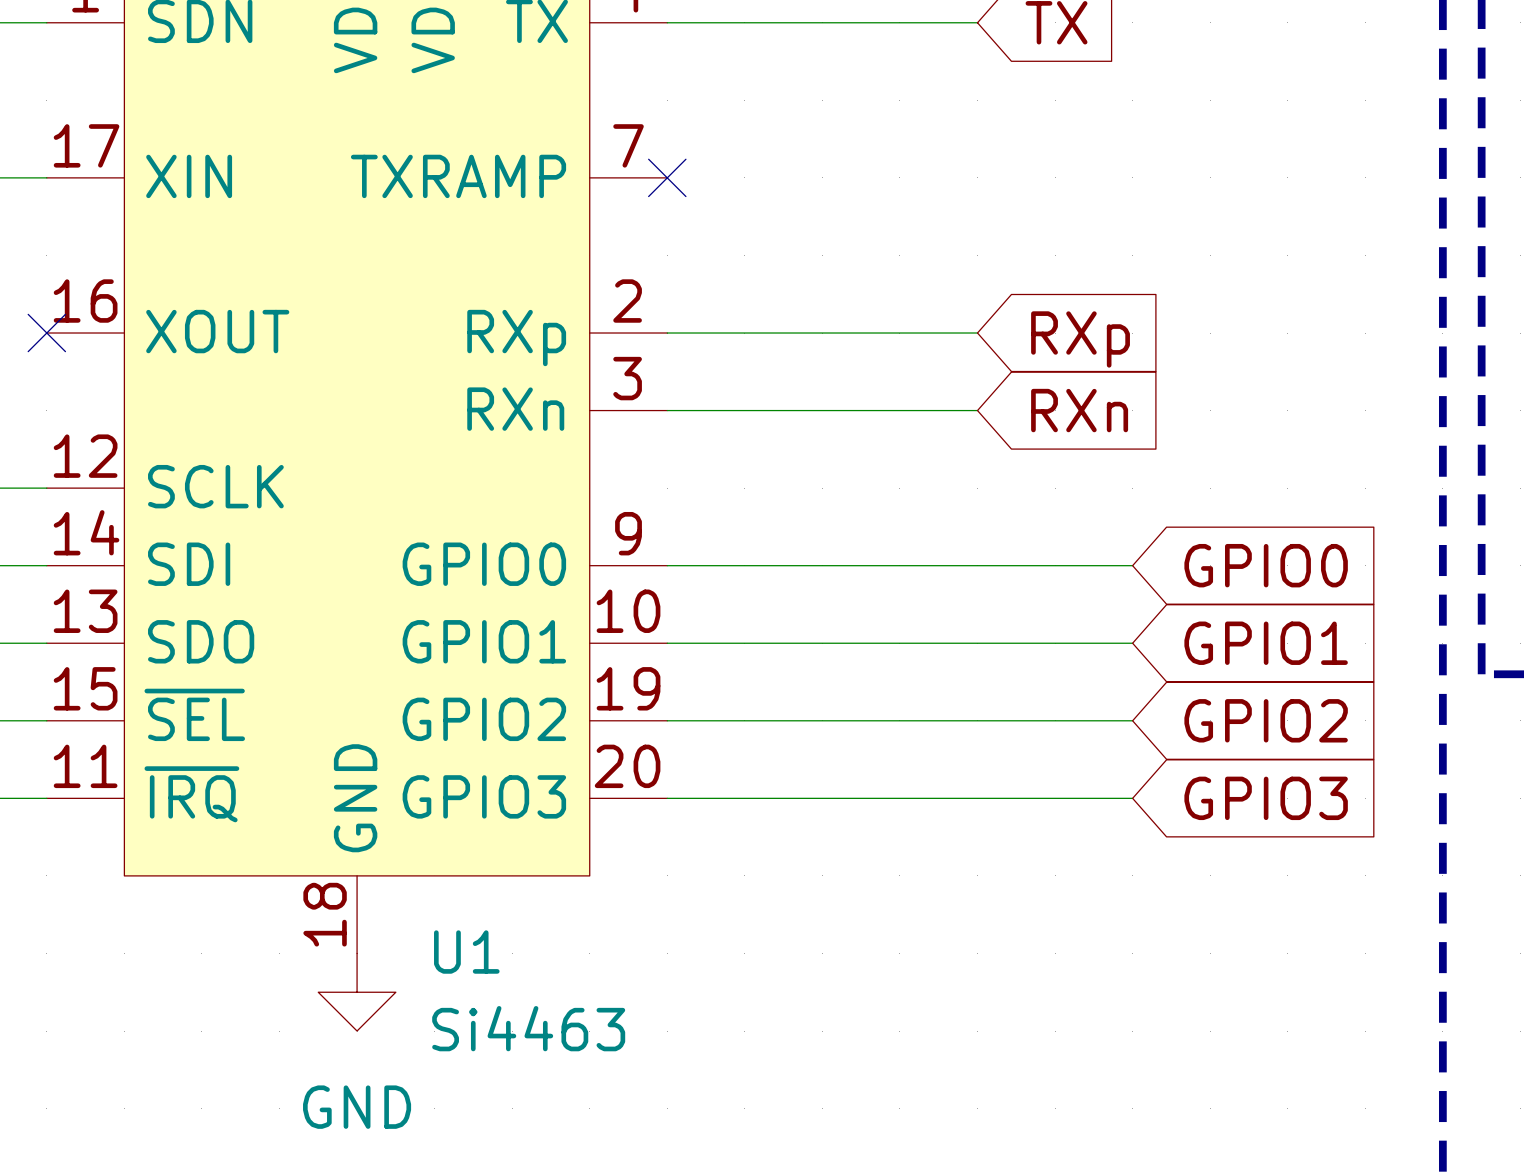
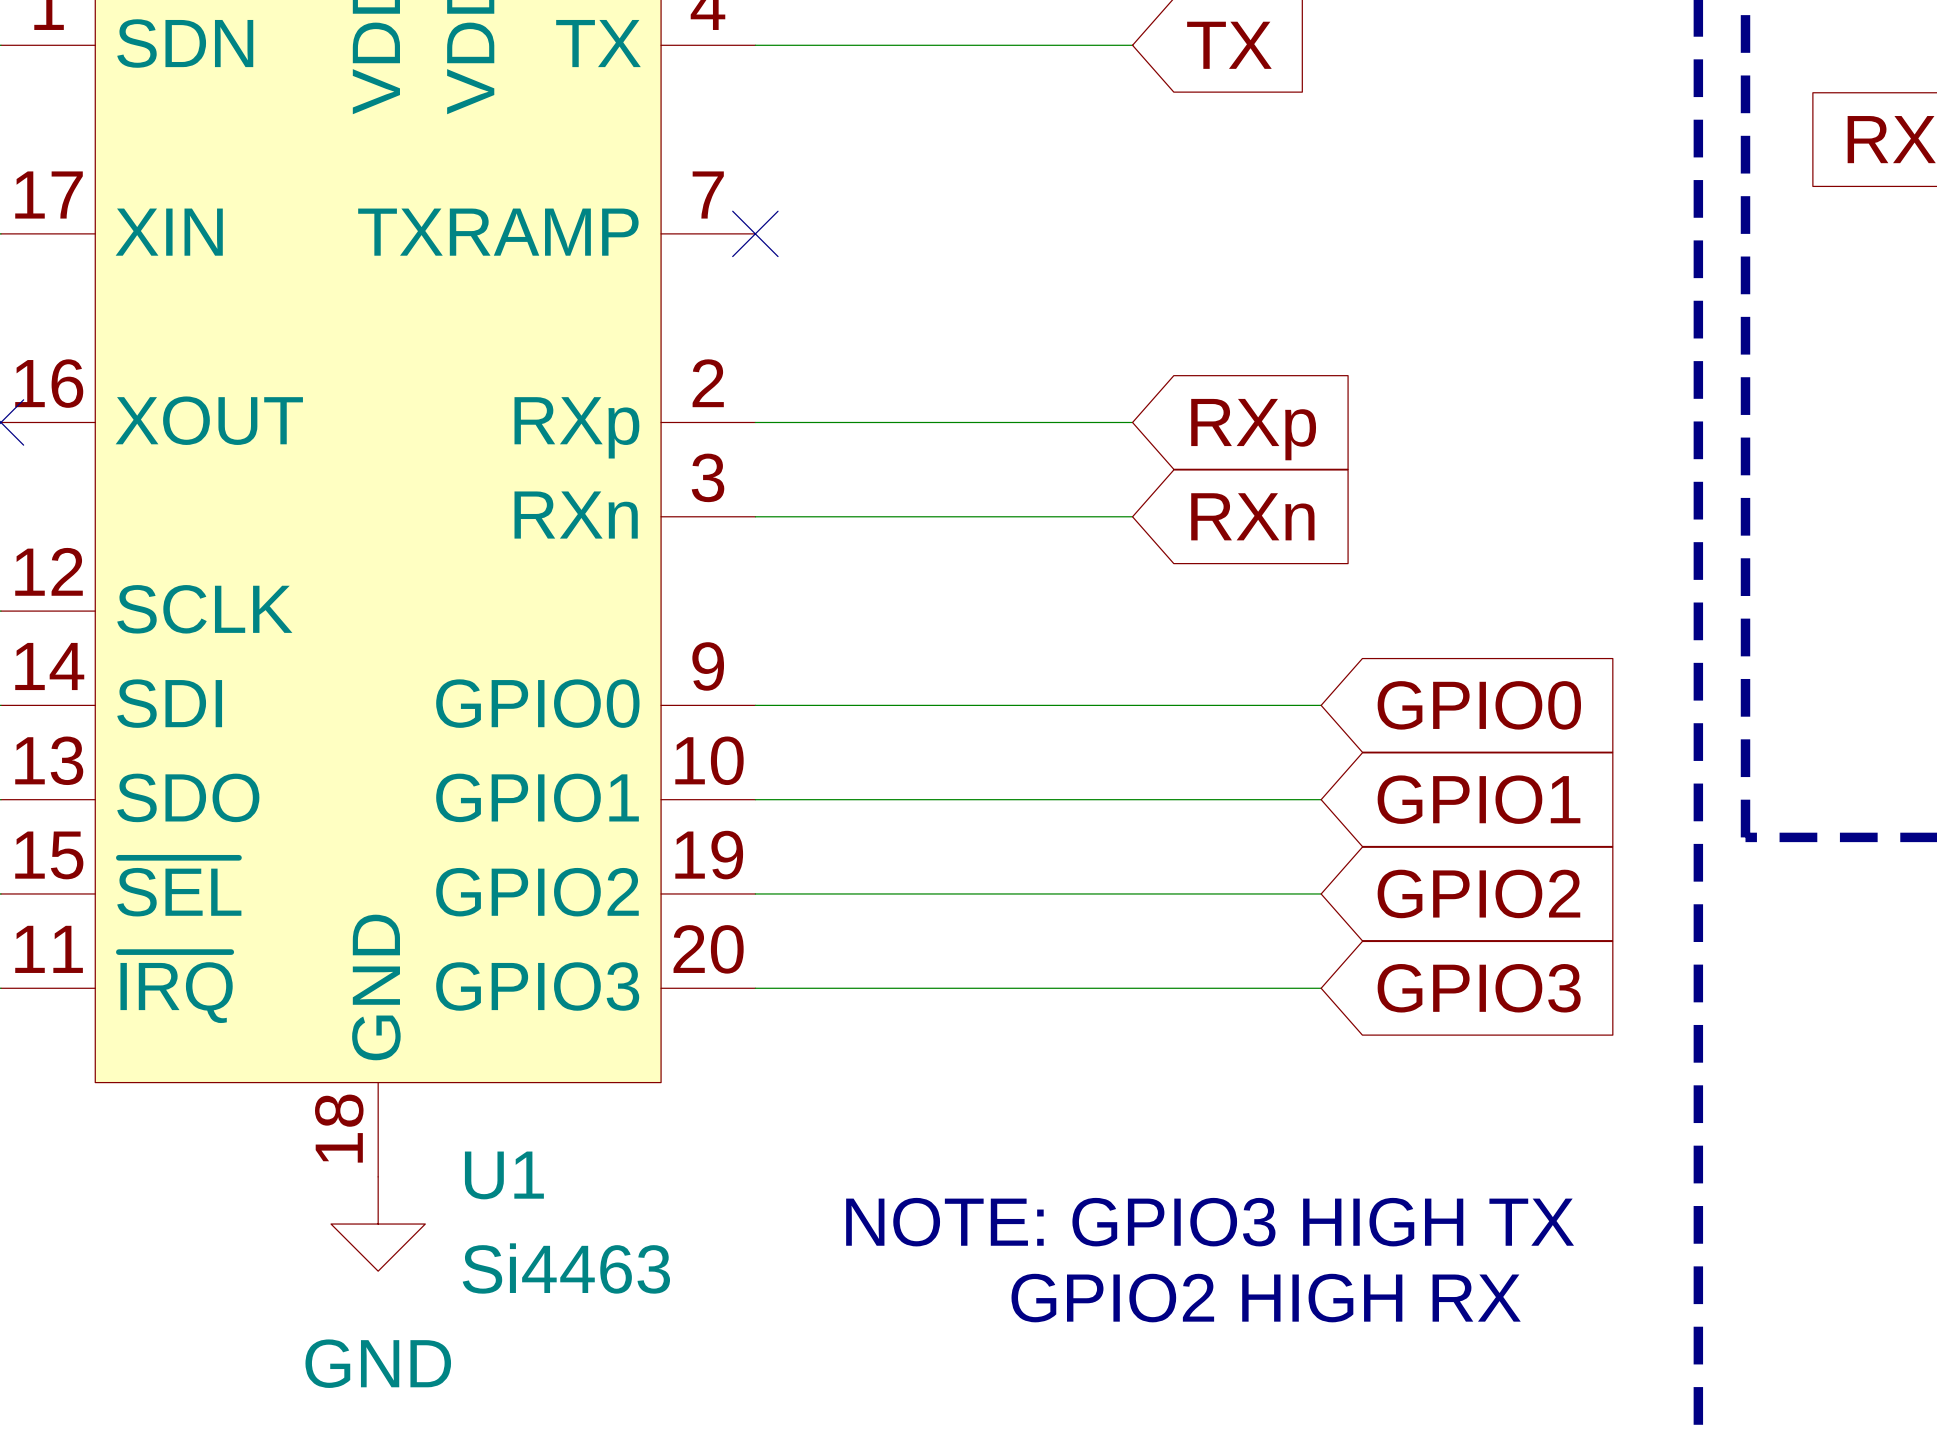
text: none -> NOTE: GPIO3 HIGH TX (1210, 1222)
text: none -> GPIO2 HIGH RX (1266, 1298)

